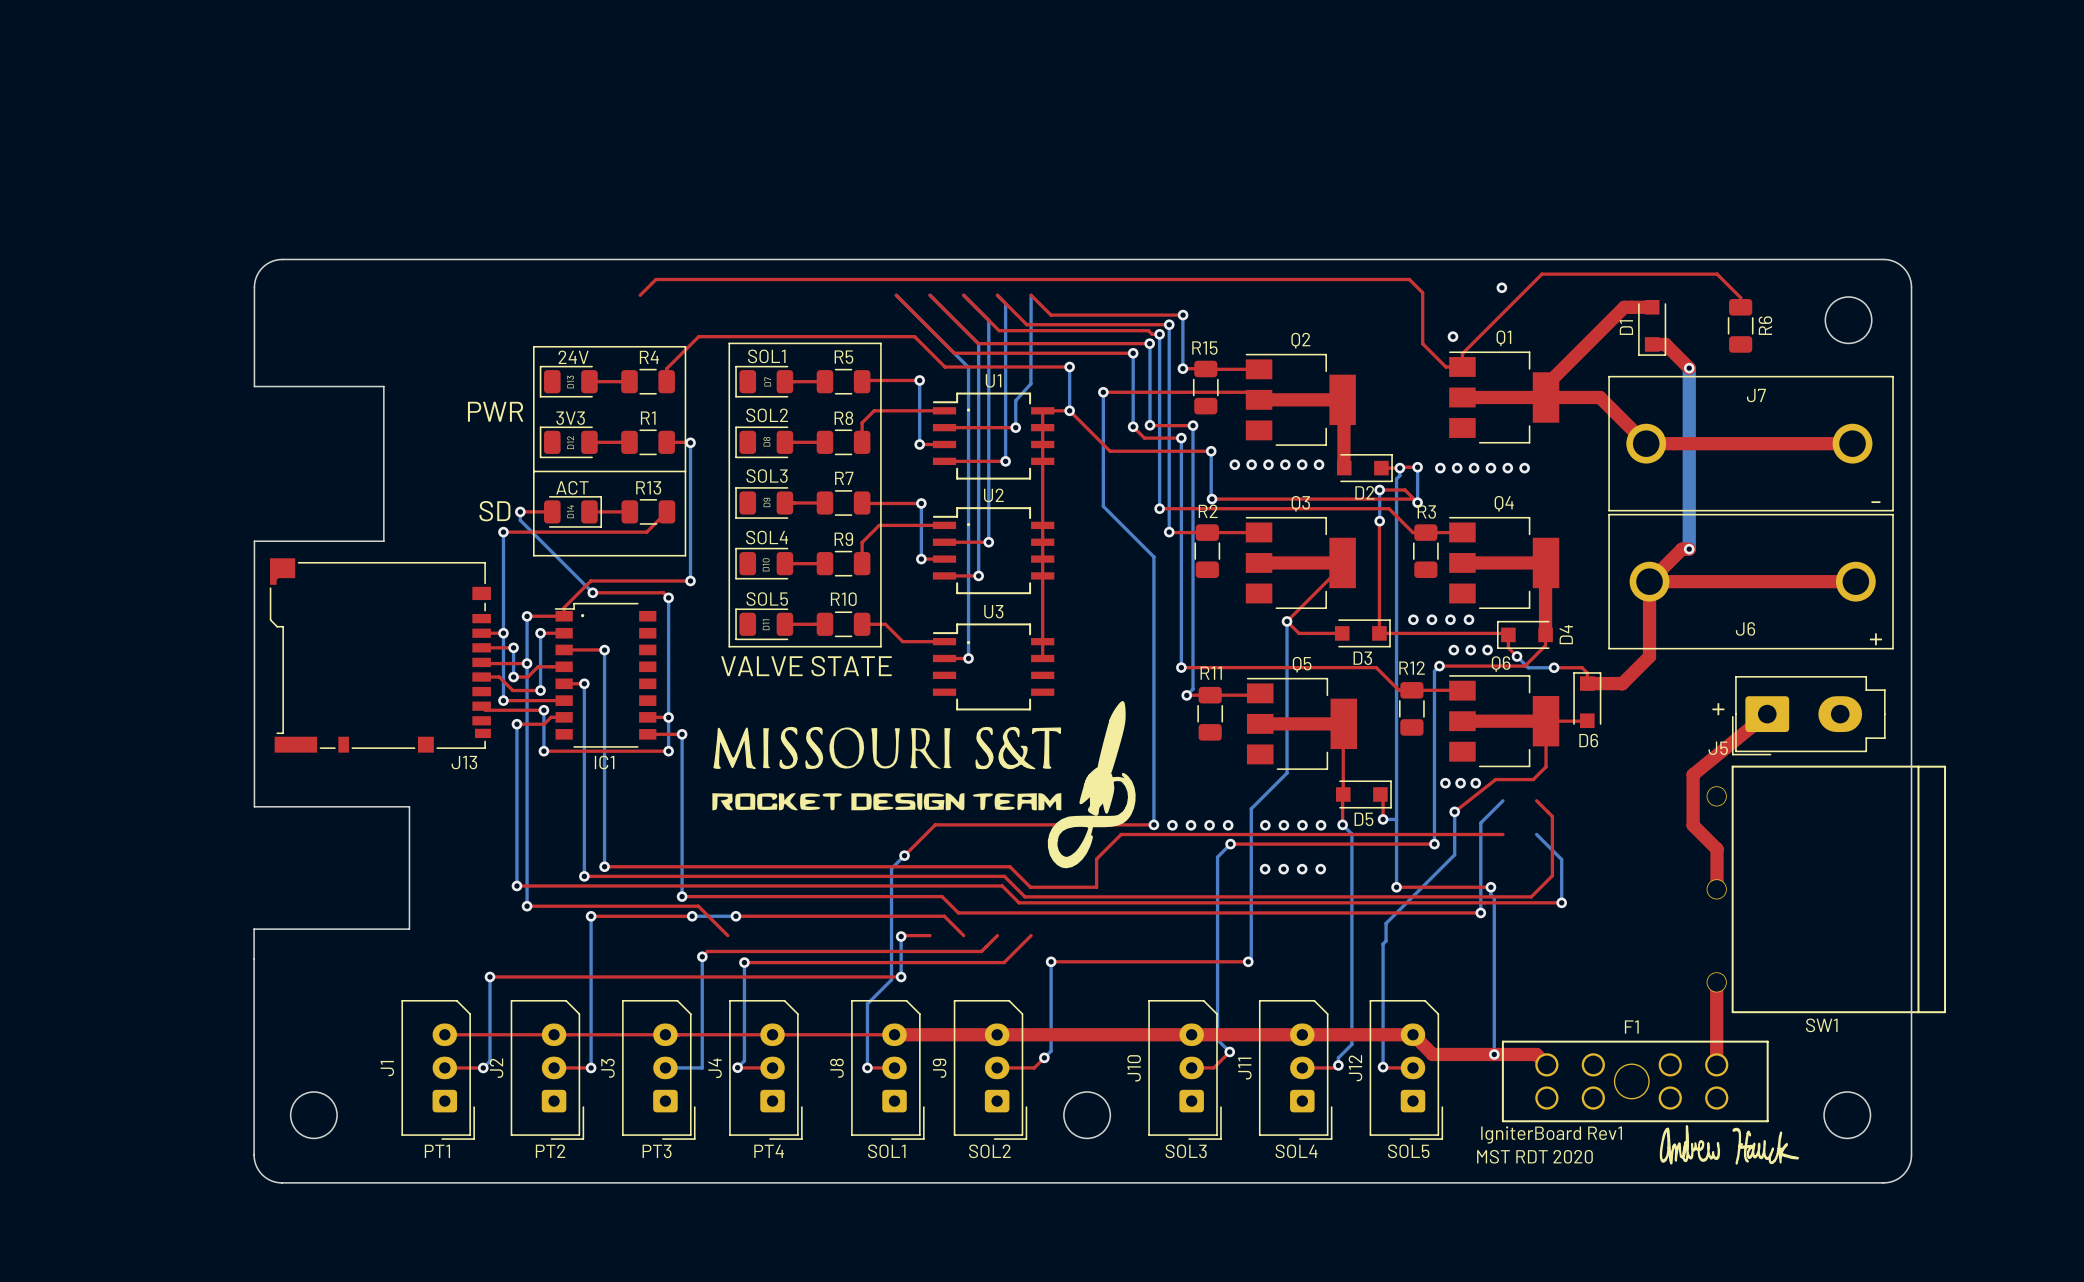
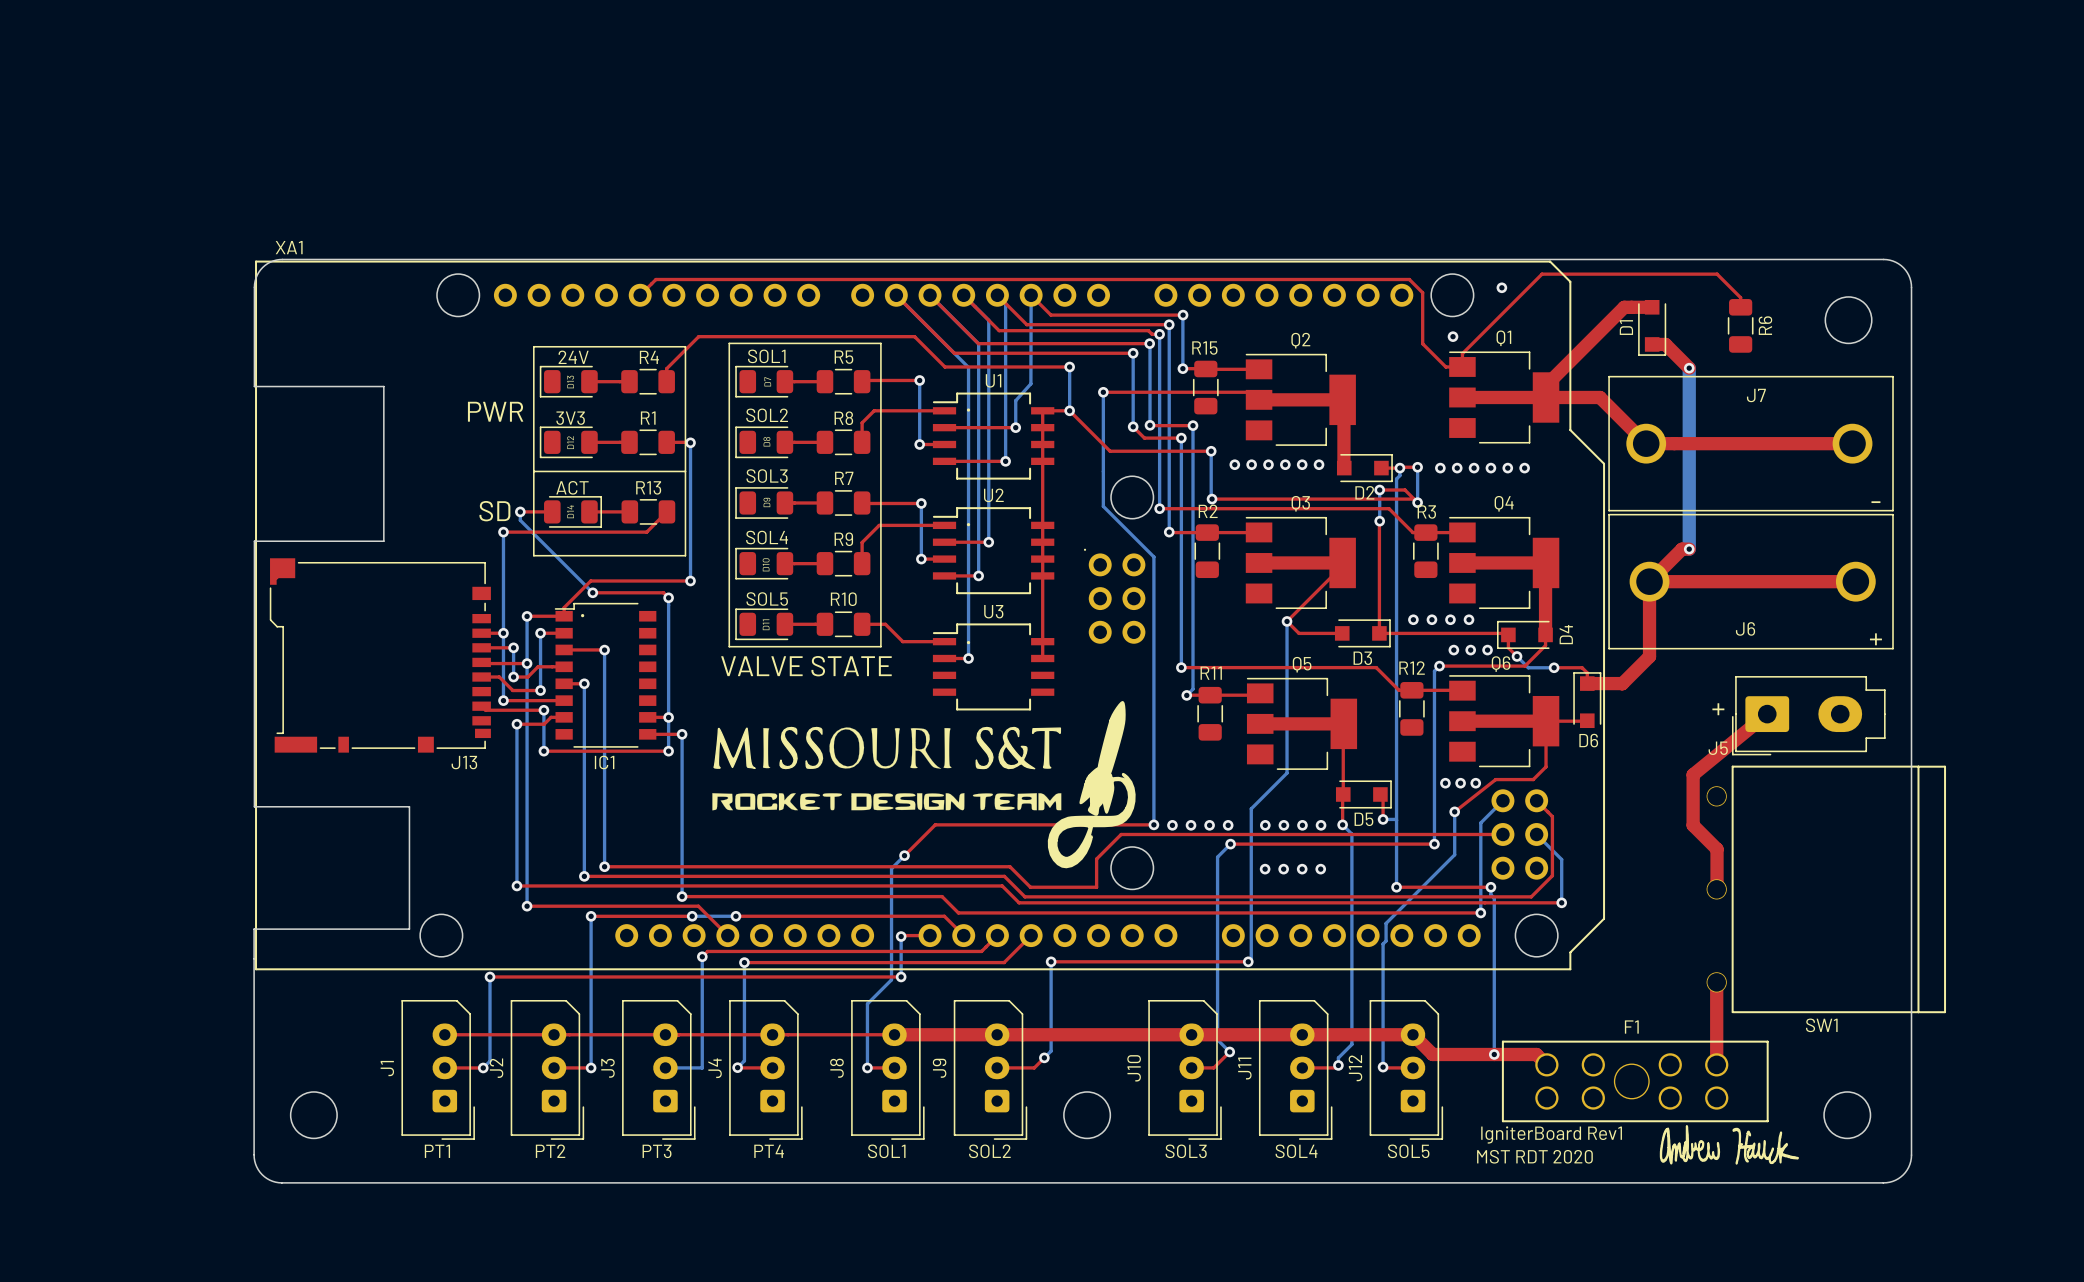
XA1: none -> (930, 615)

